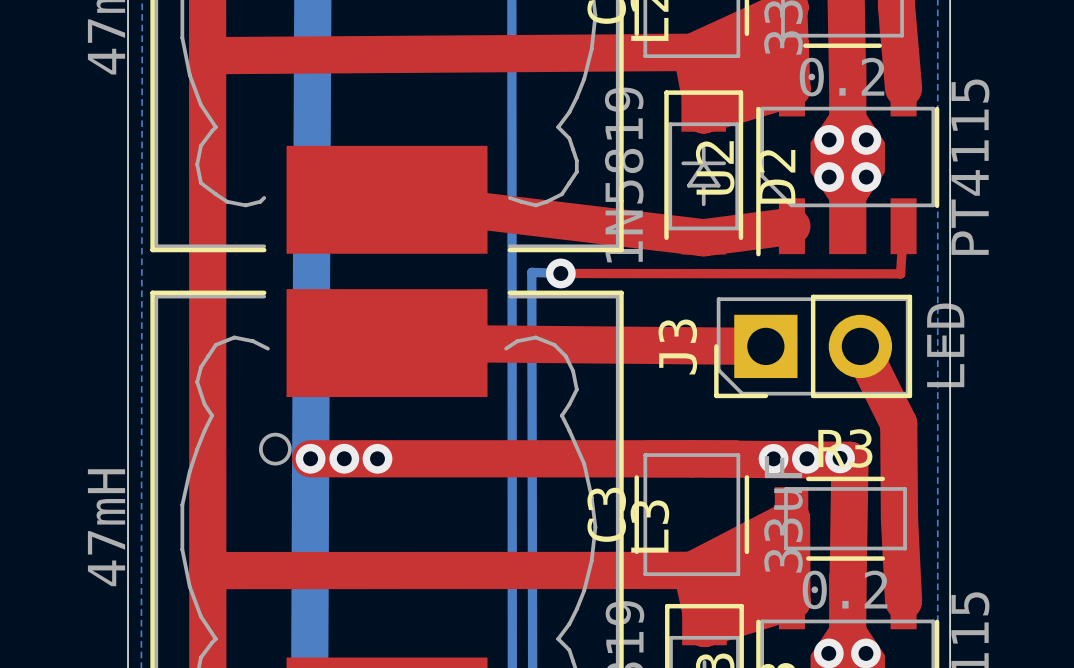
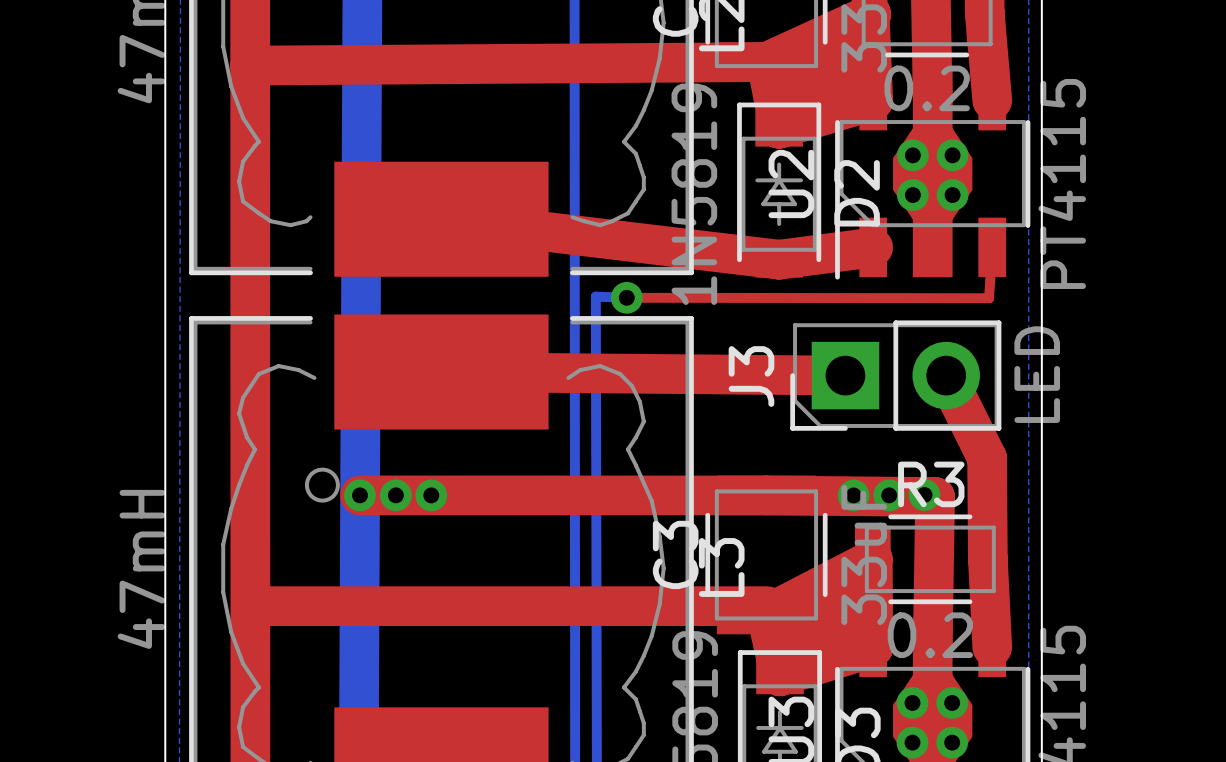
top track: none -> (254, 599) (261, 606) (767, 606)
top track: (207, 570) (691, 570) -> none

